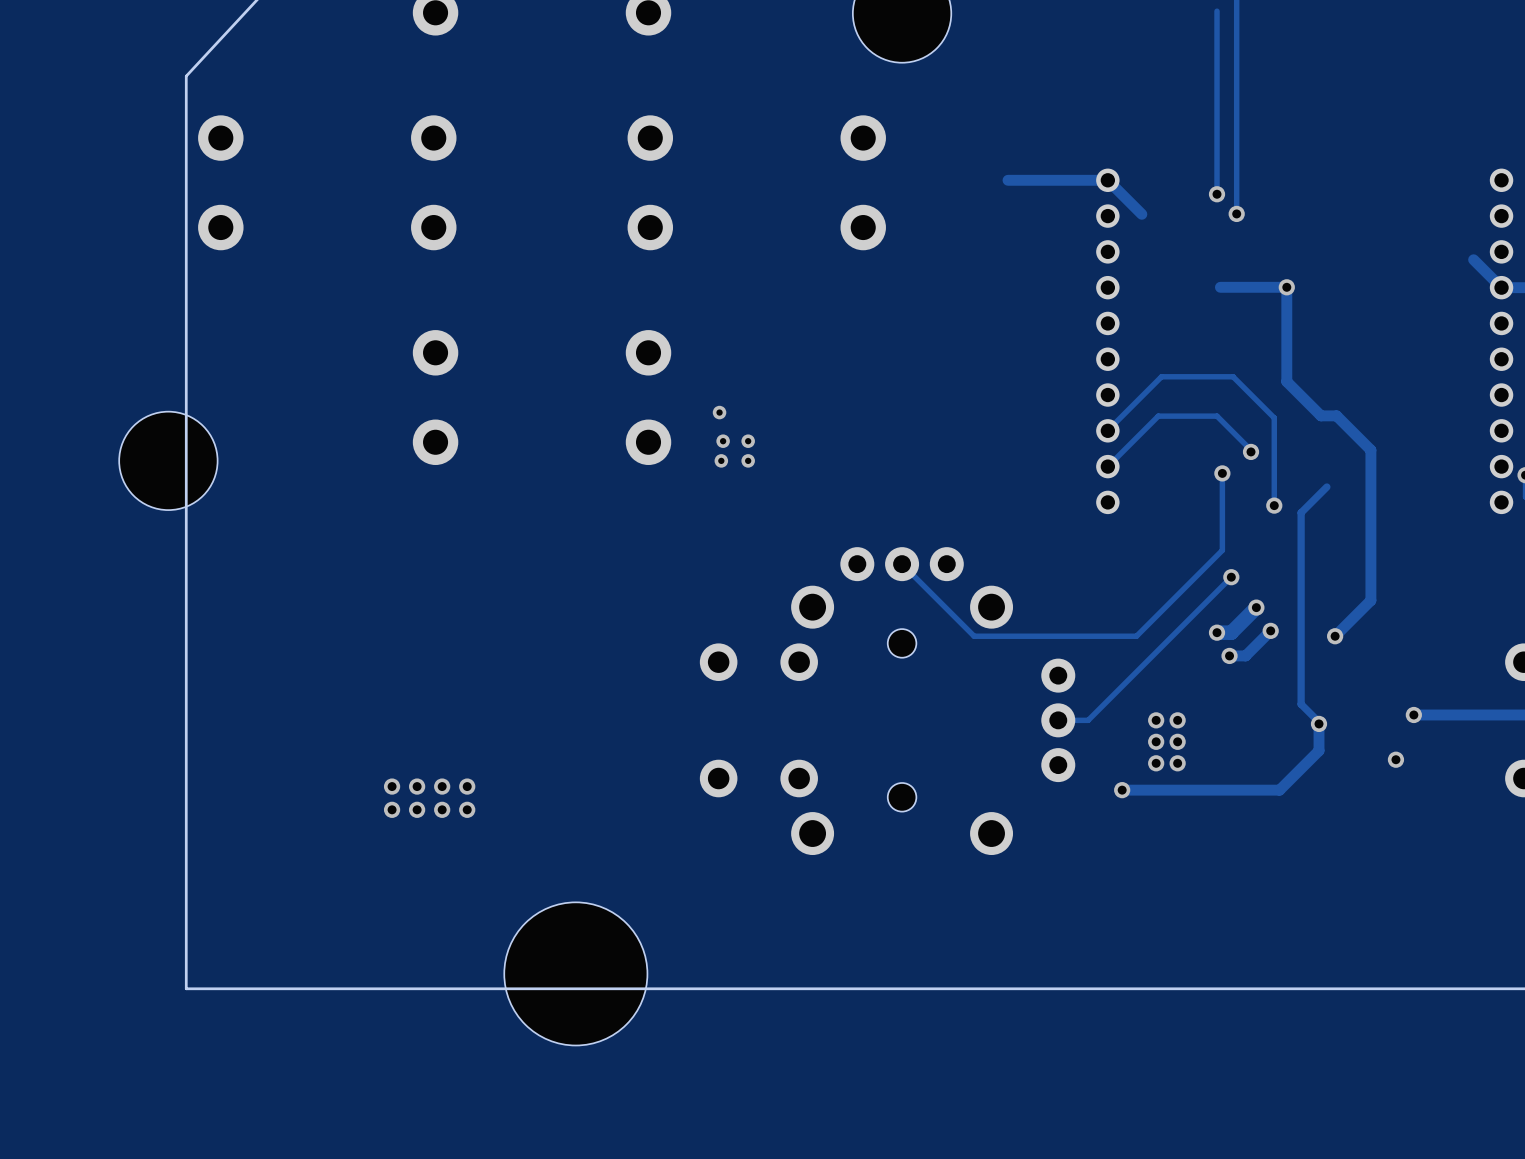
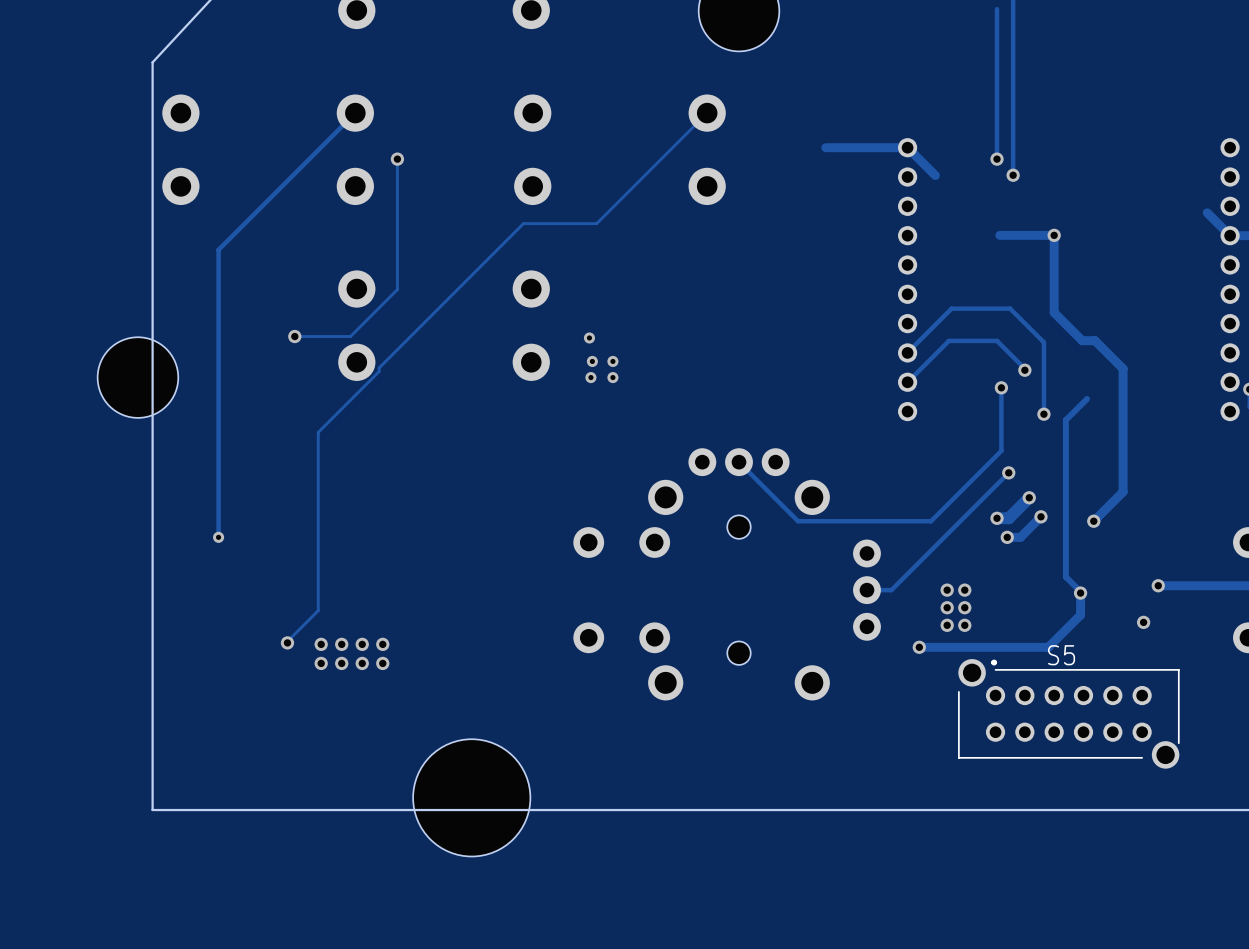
track: none -> (355, 113) (218, 249) (218, 537)
track: none -> (707, 113) (596, 223) (523, 223) (379, 368) (379, 371) (318, 432) (318, 610) (287, 641) (287, 644)
track: none -> (397, 159) (397, 289) (350, 336) (294, 336)
via: none -> (397, 159)
via: none -> (294, 336)
via: none -> (218, 537)
via: none -> (287, 642)
S5: none -> (1068, 713)

